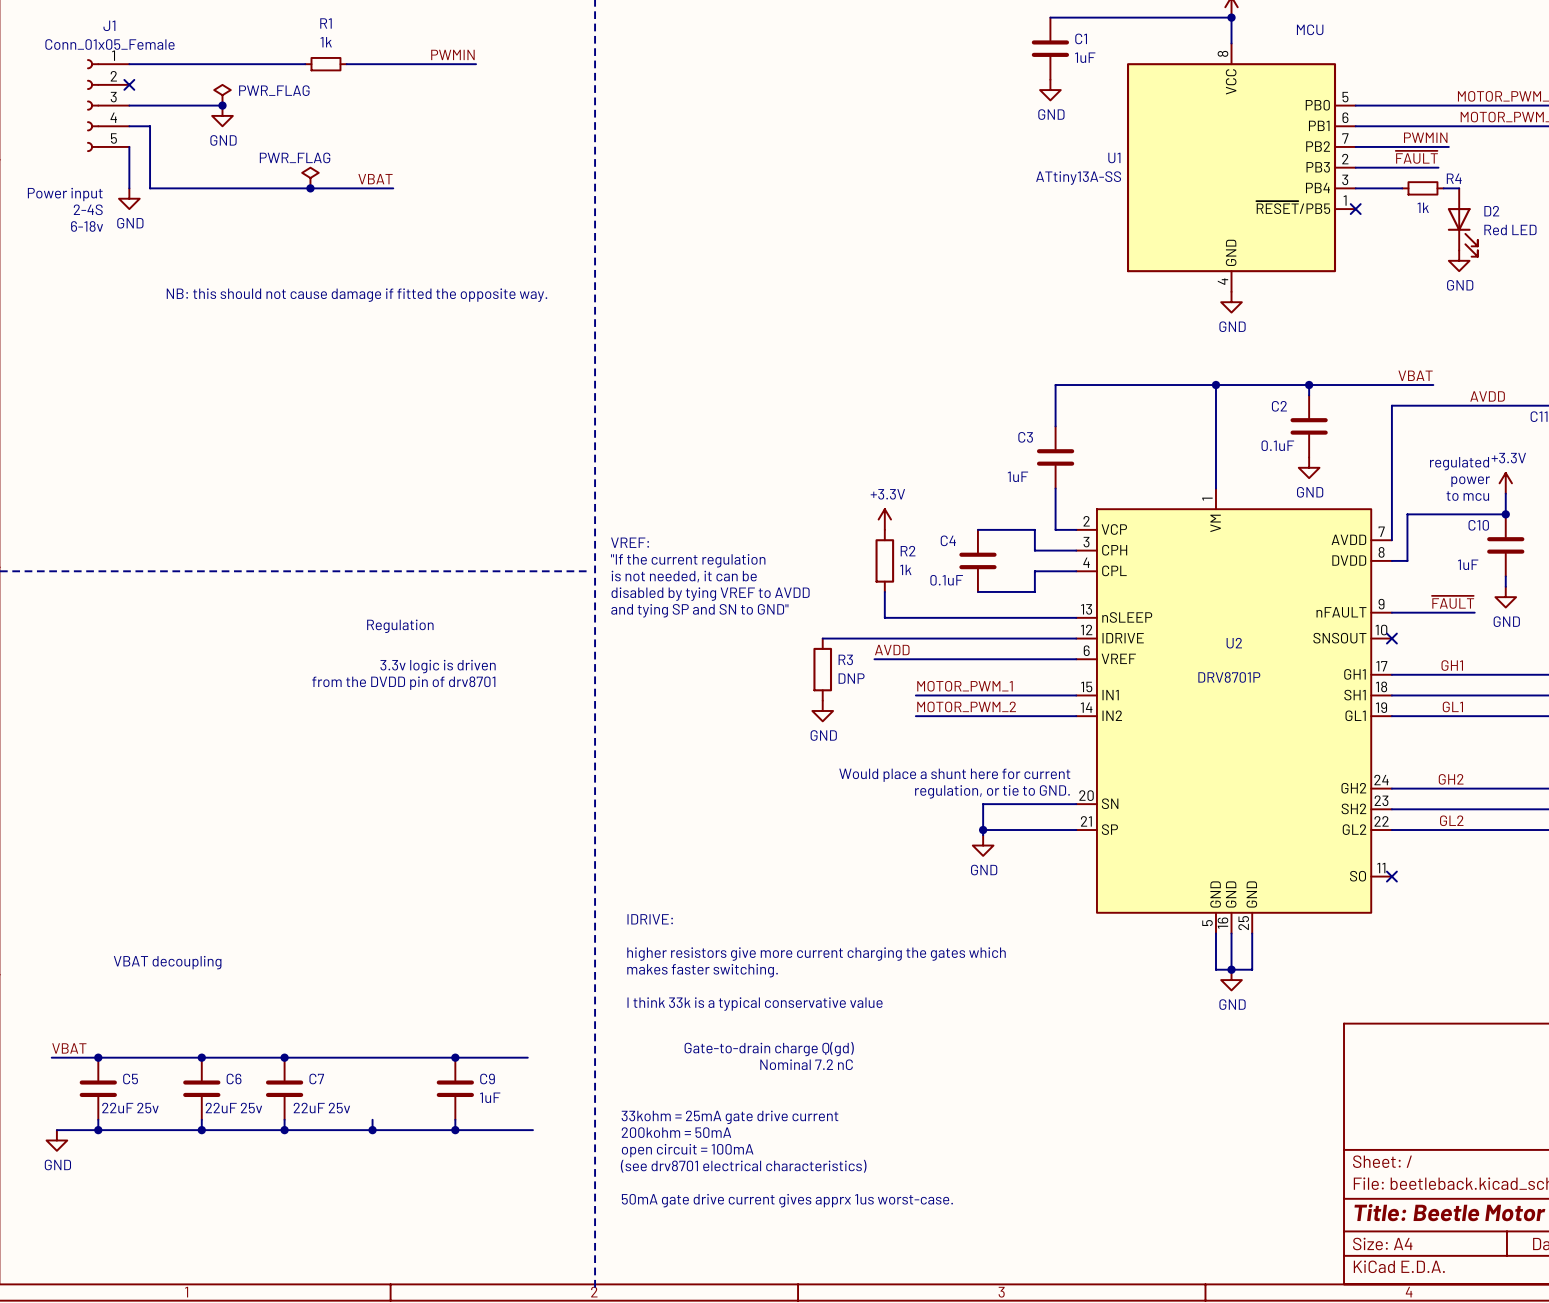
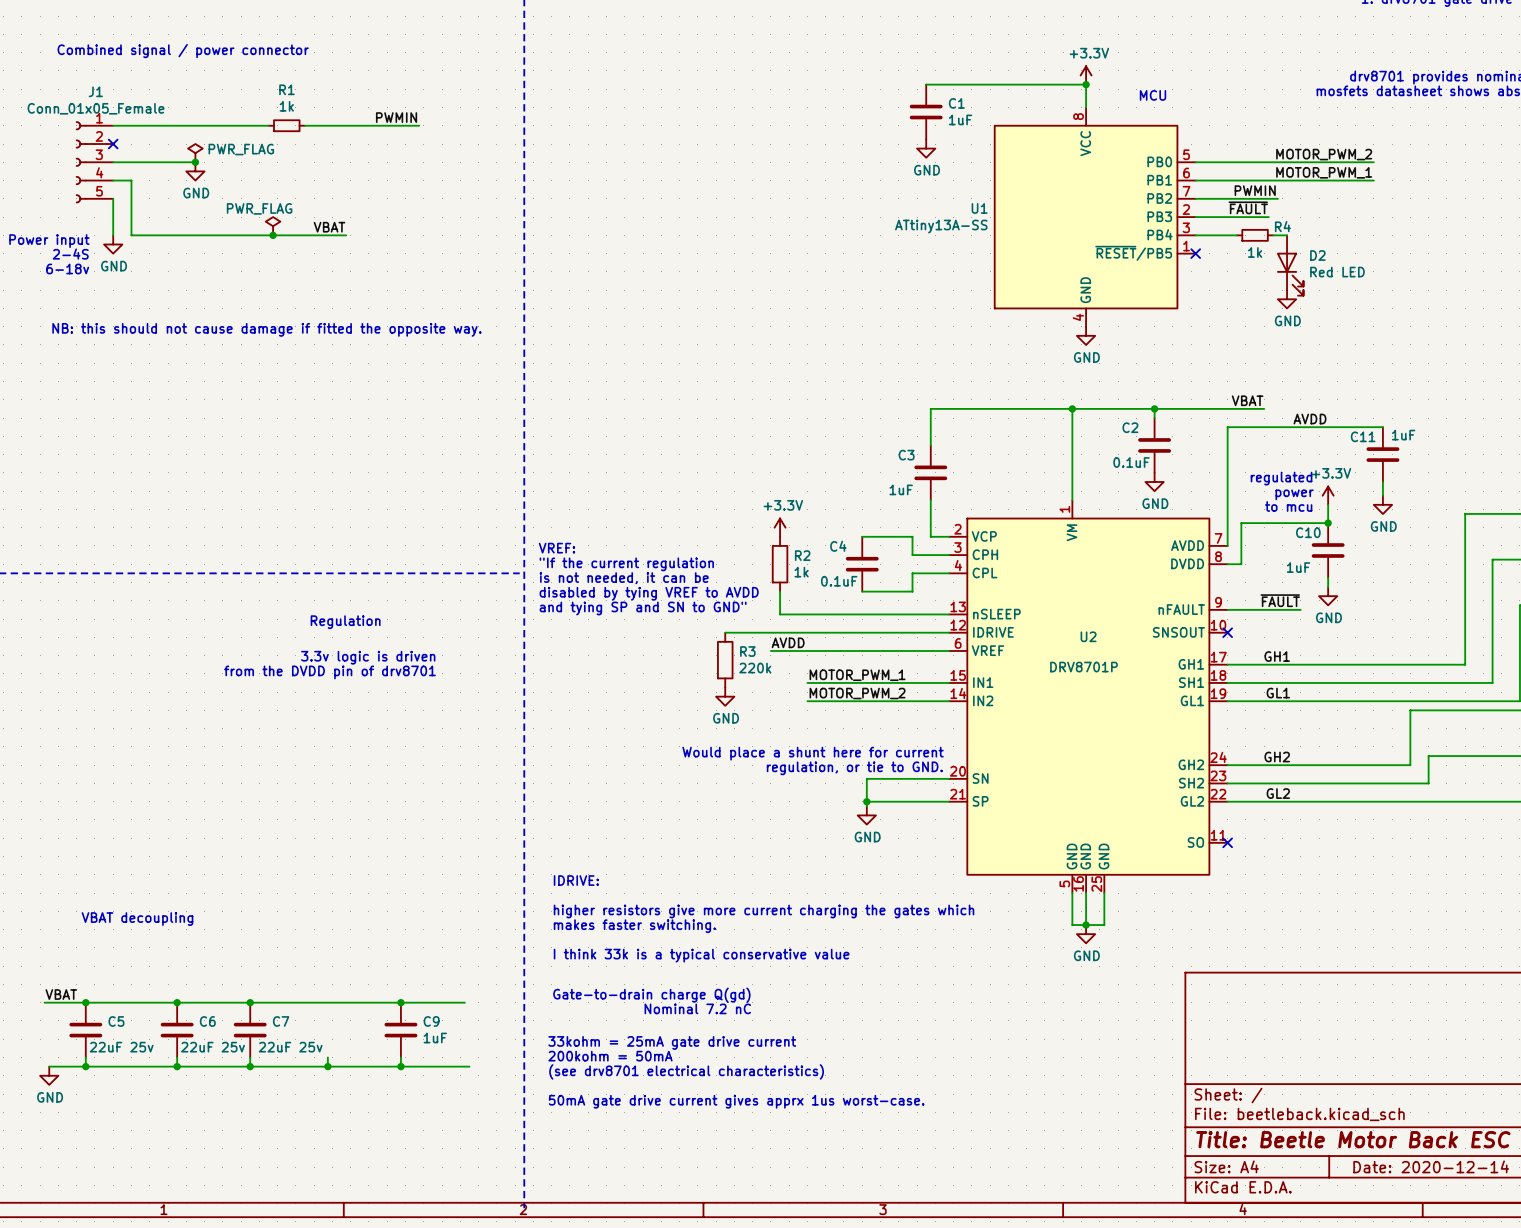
R3 value: DNP (851, 678) -> 220k (755, 668)
text: none -> 33kohm = 25mA gate drive current (672, 1042)
text: 33kohm = 25mA gate drive current (729, 1117) -> 200kohm = 50mA (610, 1056)
text: 200kohm = 50mA (676, 1132) -> (see drv8701 electrical characteristics) (686, 1071)
text: open circuit = 100mA (687, 1150) -> none
text: (see drv8701 electrical characteristics) (743, 1166) -> 50mA gate drive current gives apprx 1us worst-case. (736, 1101)
text: 50mA gate drive current gives apprx 1us worst-case. (787, 1200) -> none

